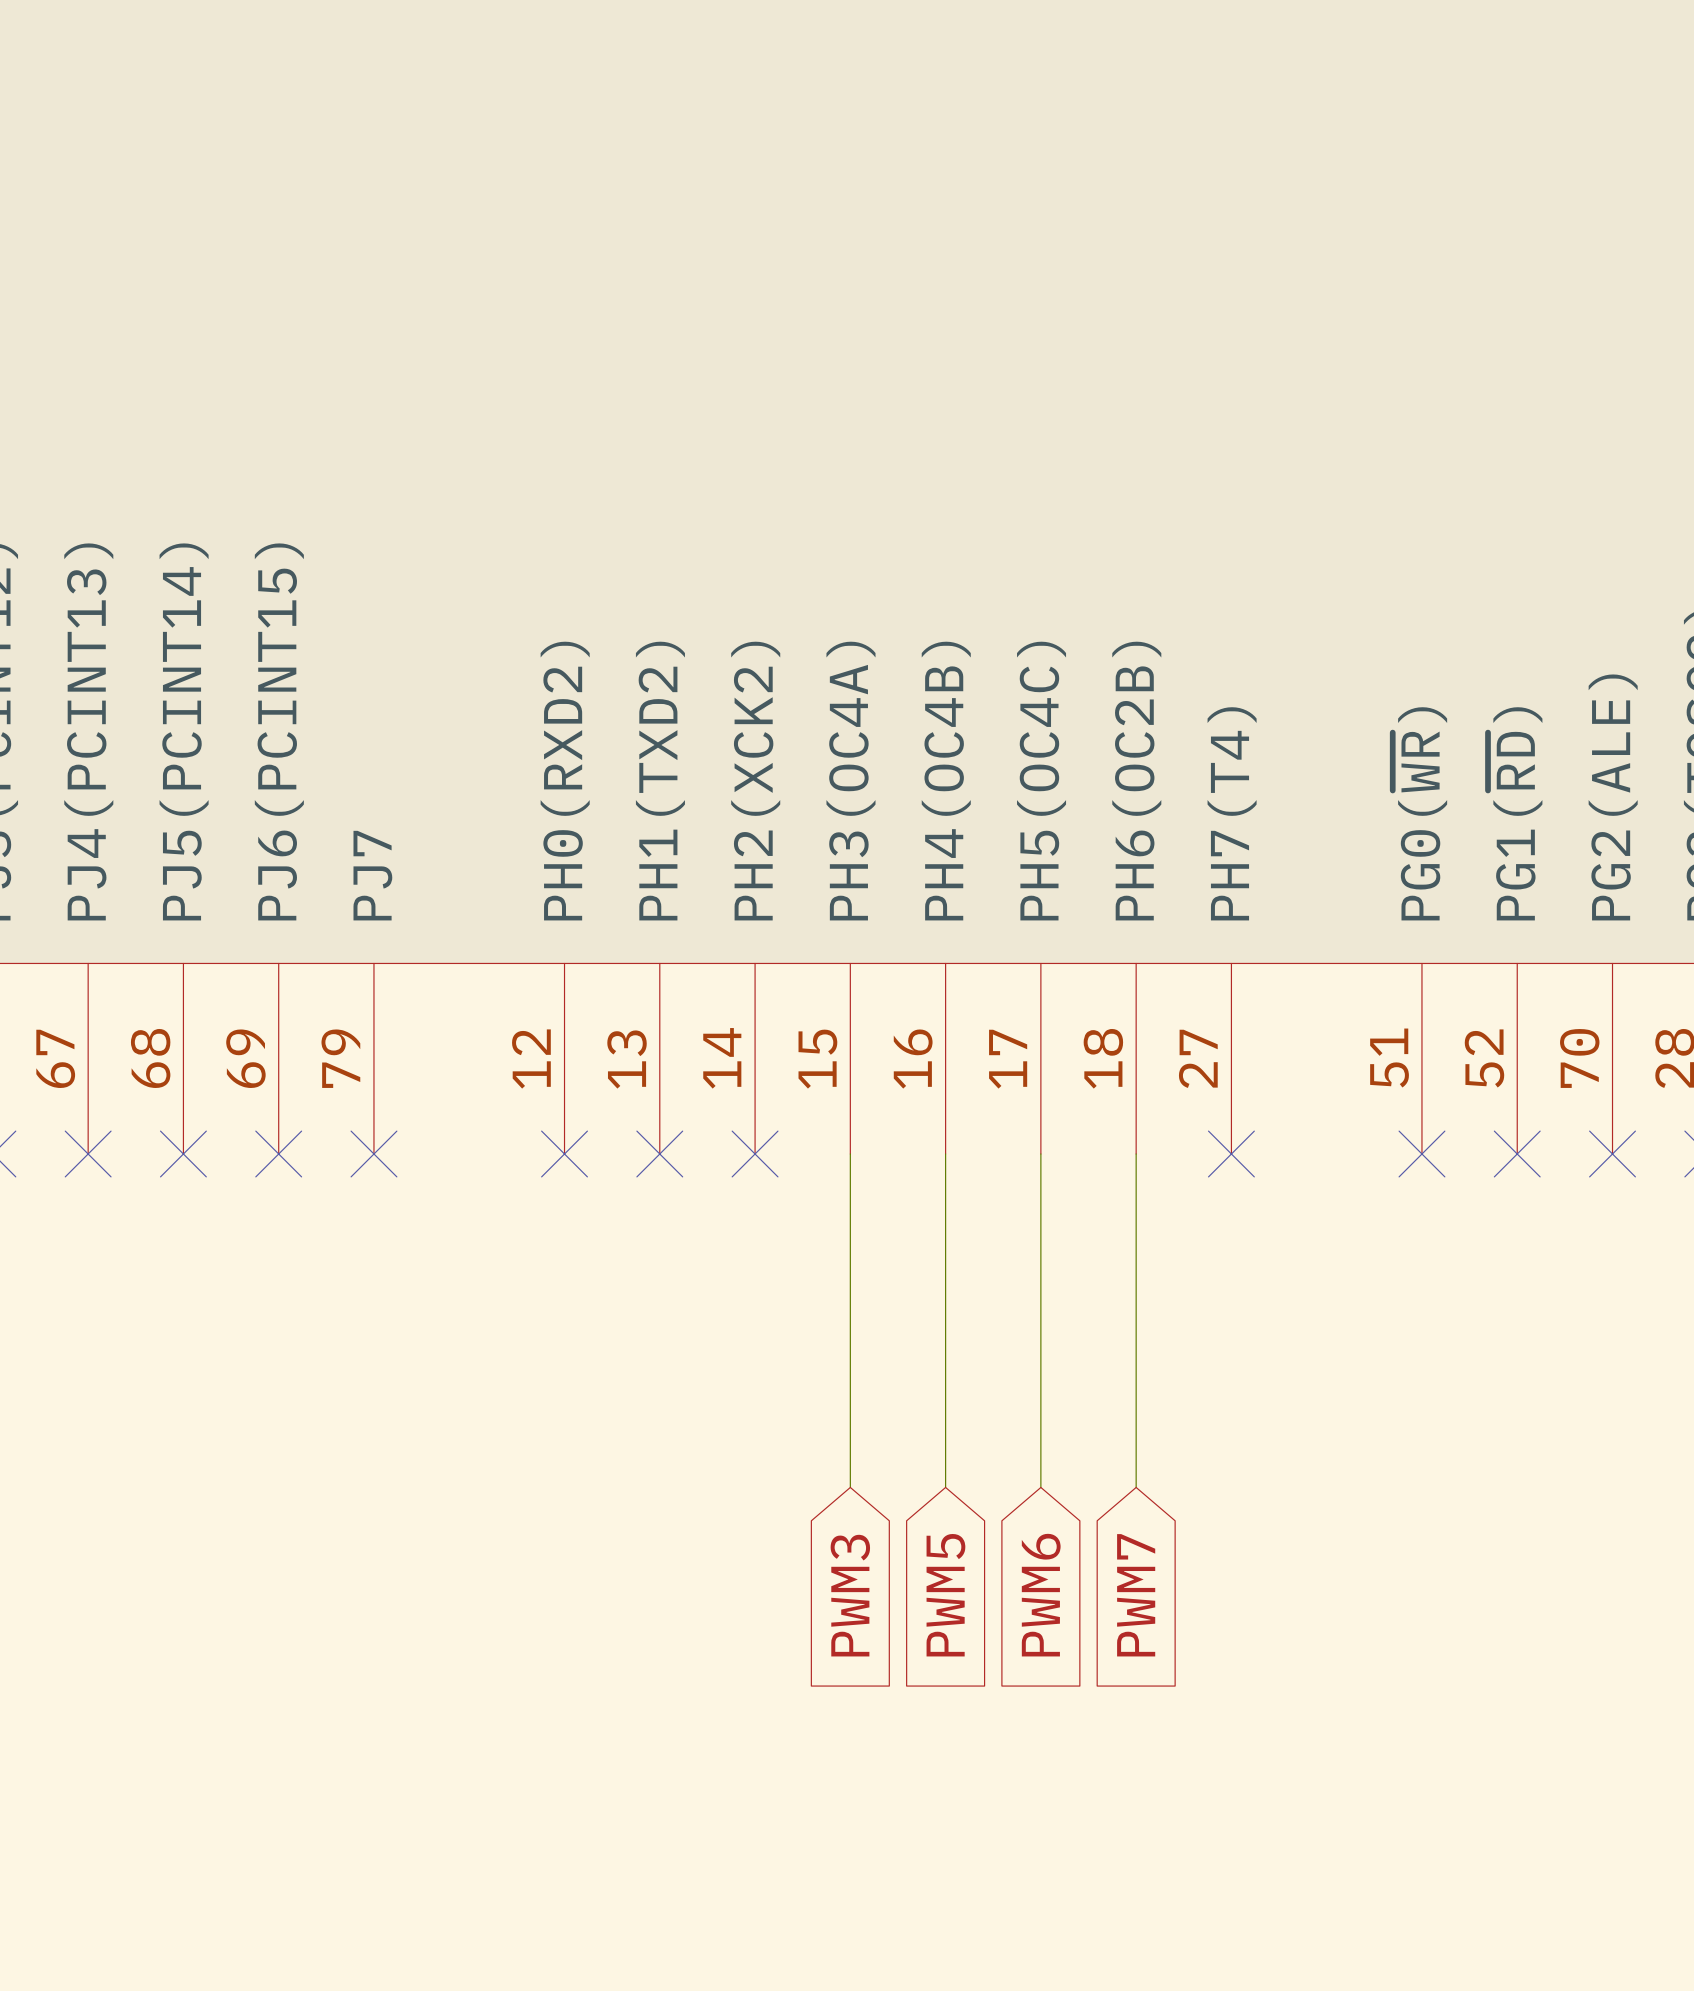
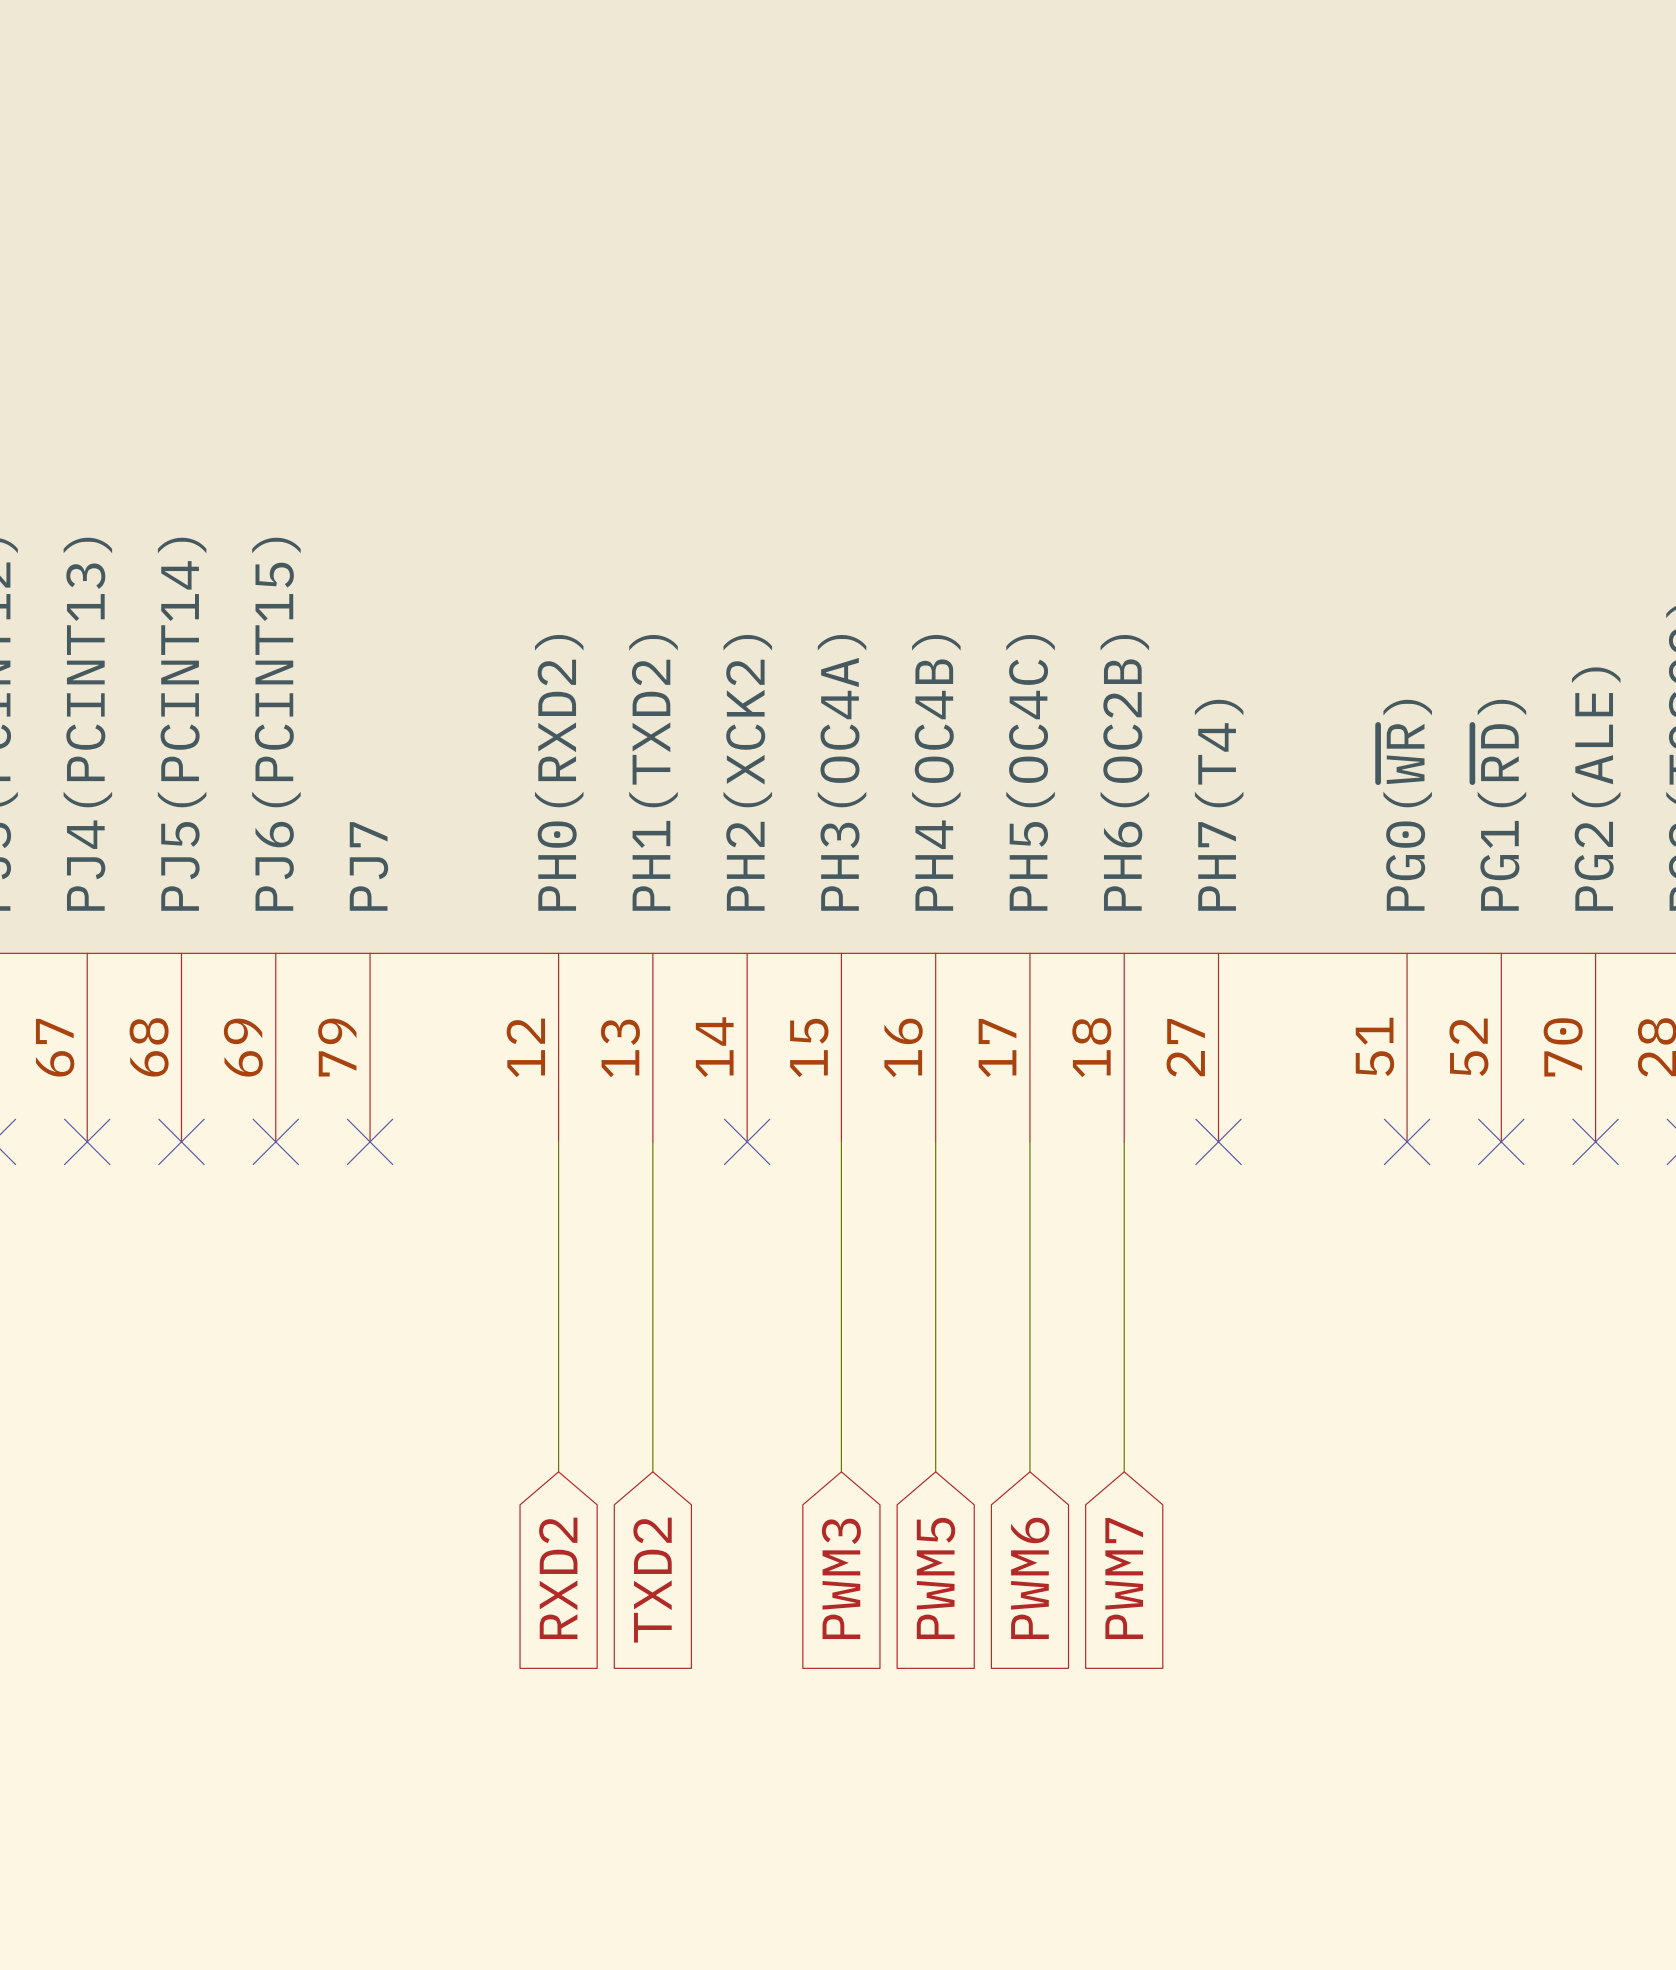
wire: none -> (558, 1141) (558, 1471)
no-connect mark: (564, 1154) -> none
wire: none -> (652, 1141) (652, 1471)
no-connect mark: (659, 1154) -> none
global label: none -> RXD2 (558, 1578)
global label: none -> TXD2 (652, 1580)

